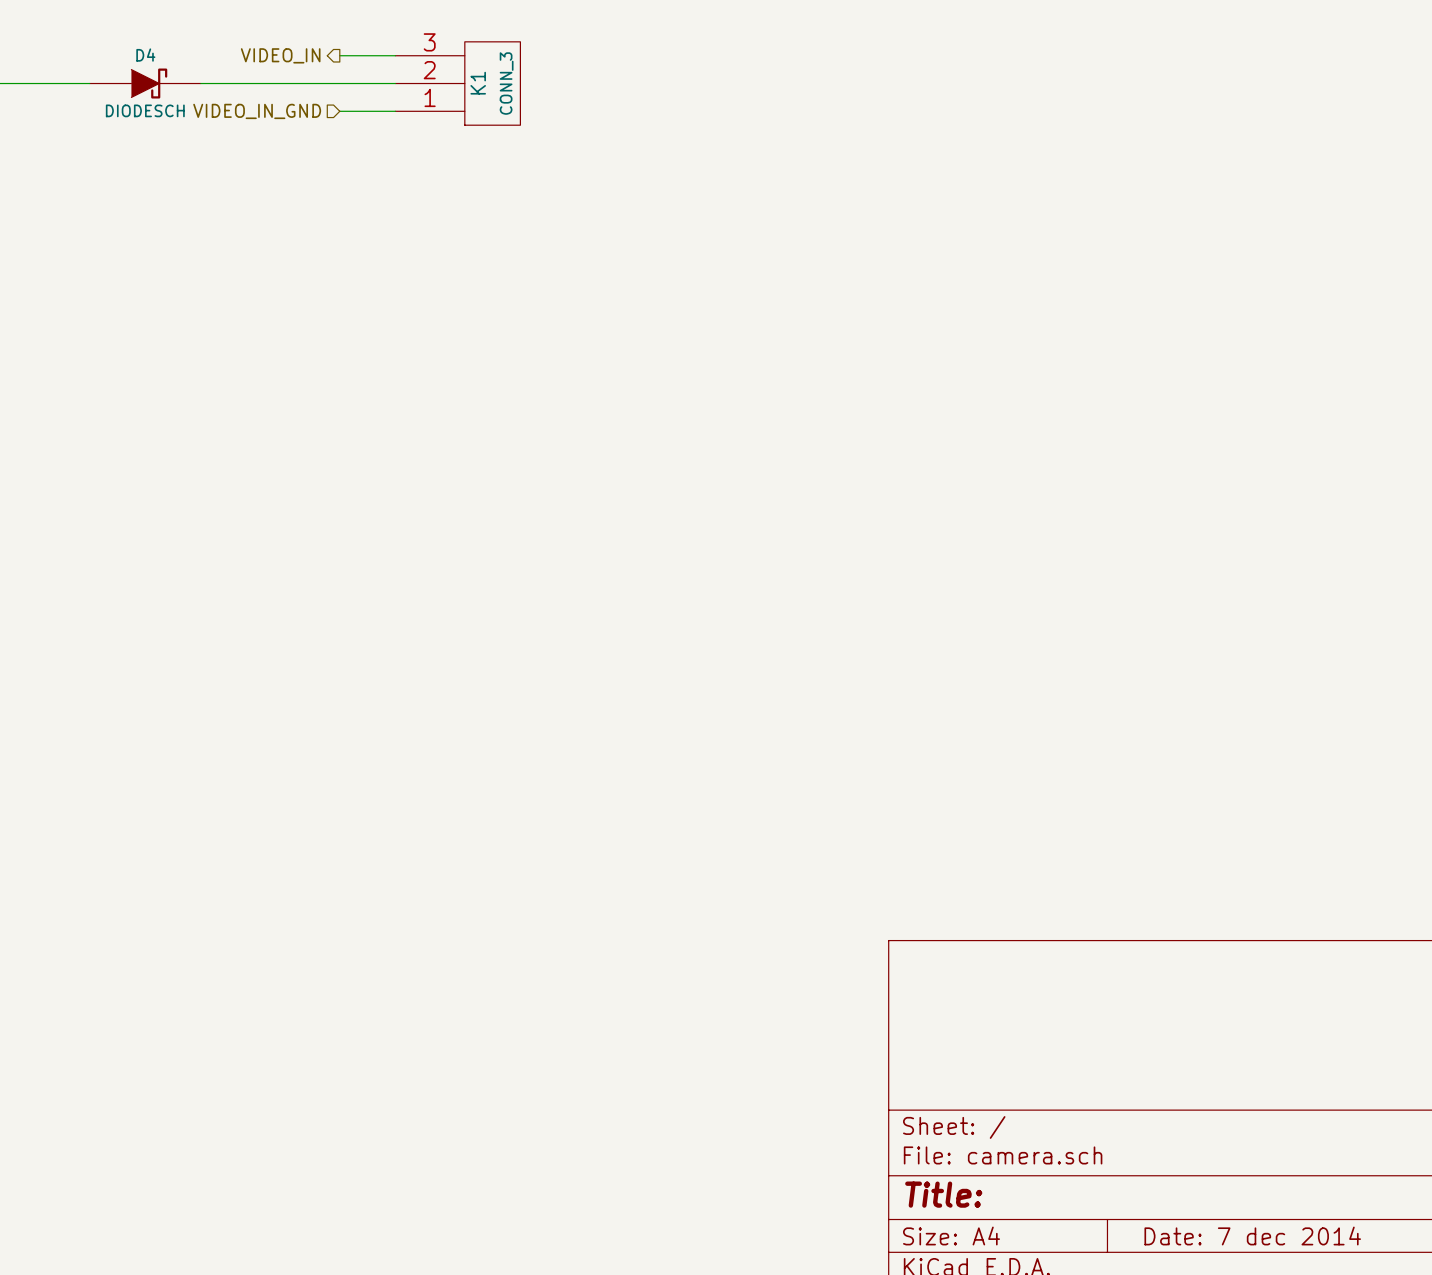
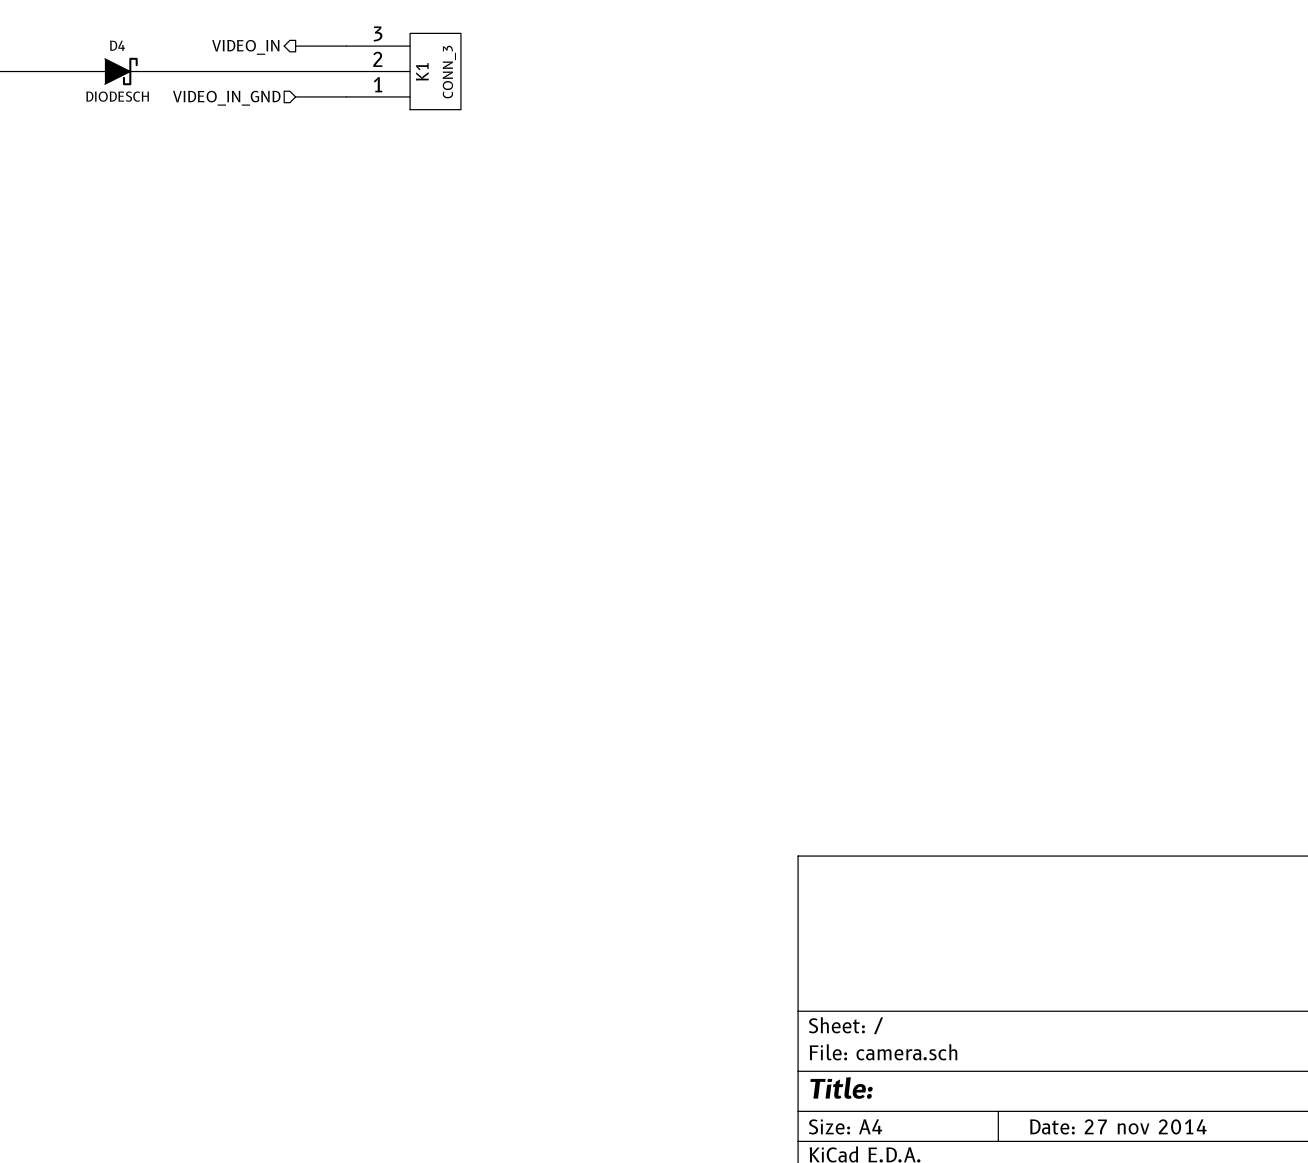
title block: Date: 7 dec 2014 (1252, 1236) -> Date: 27 nov 2014 (1118, 1126)

